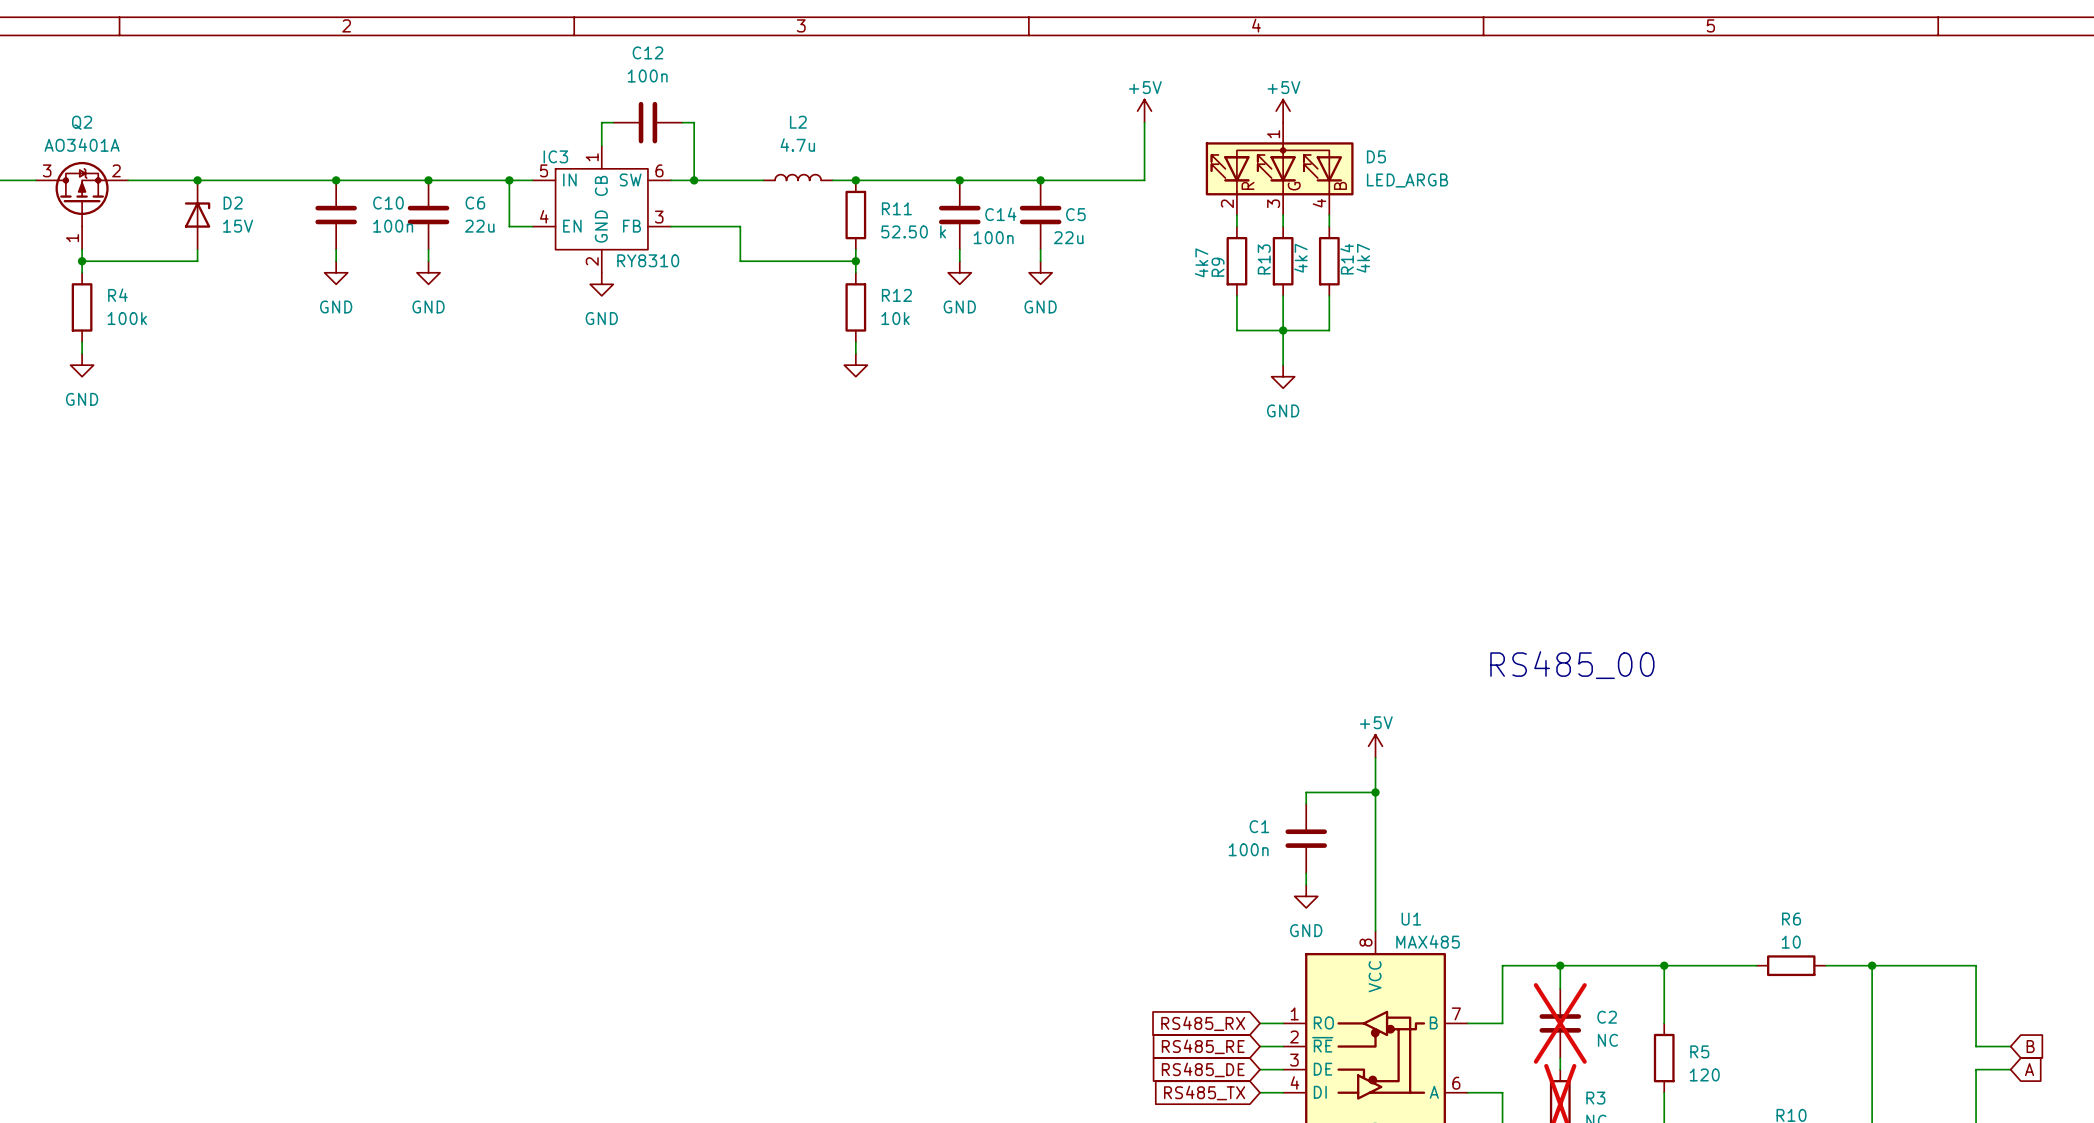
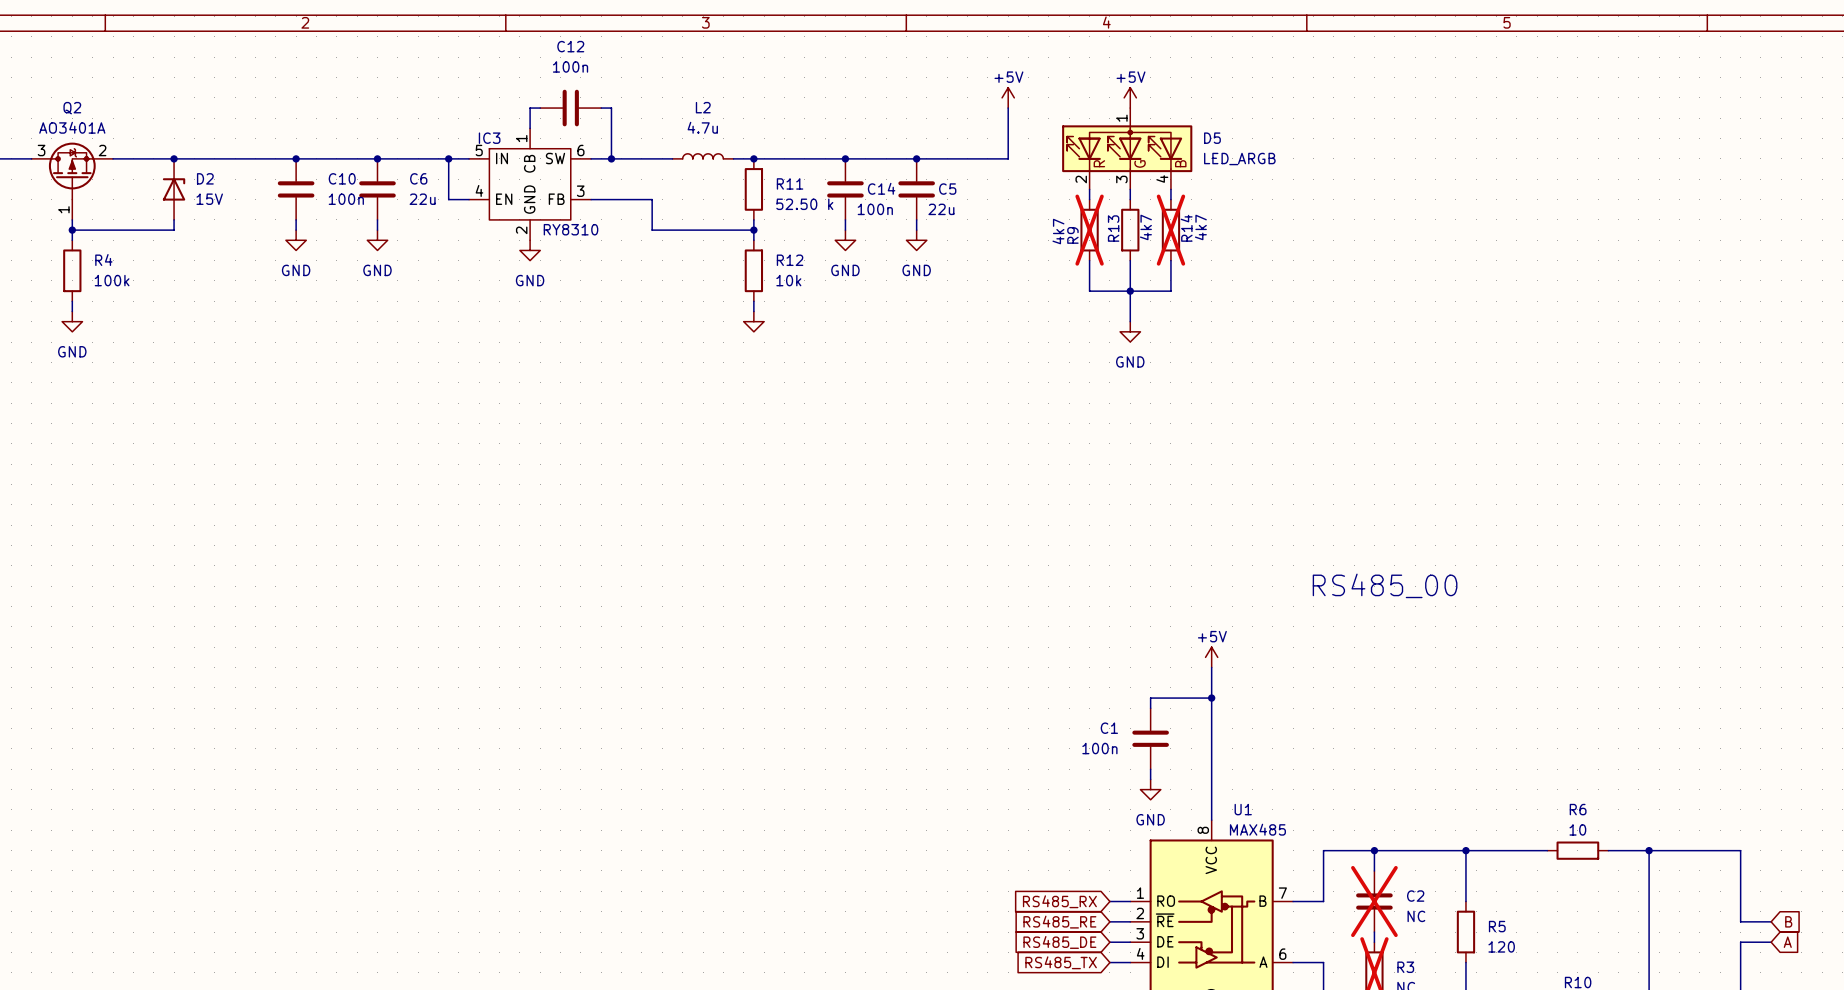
R9 do-not-place cross: none -> (1089, 230)
R14 do-not-place cross: none -> (1170, 230)

